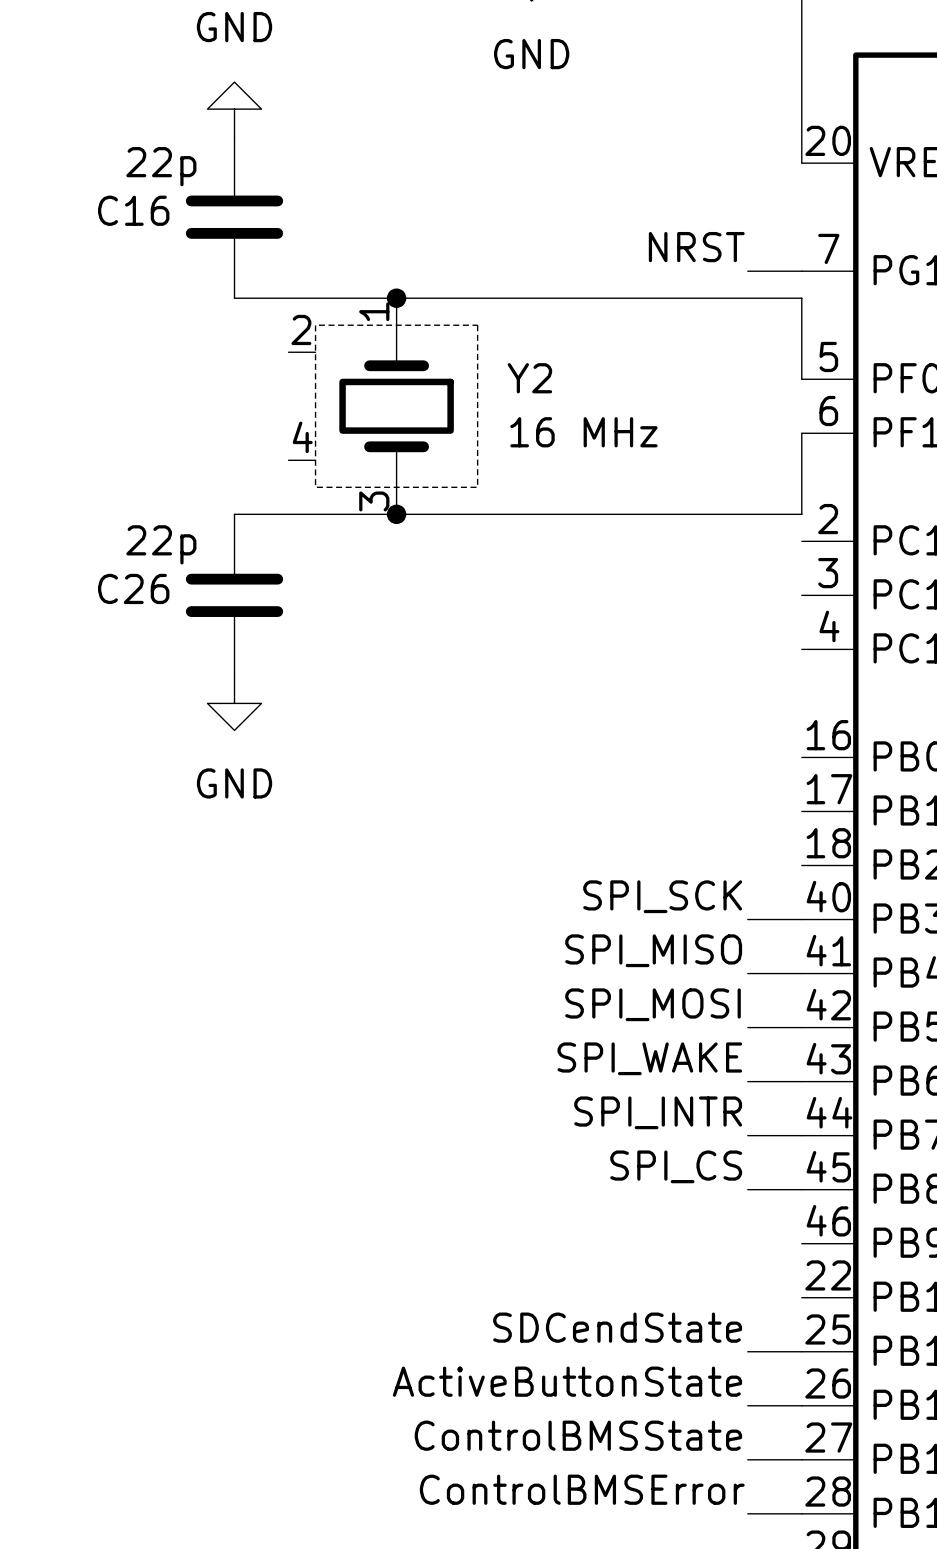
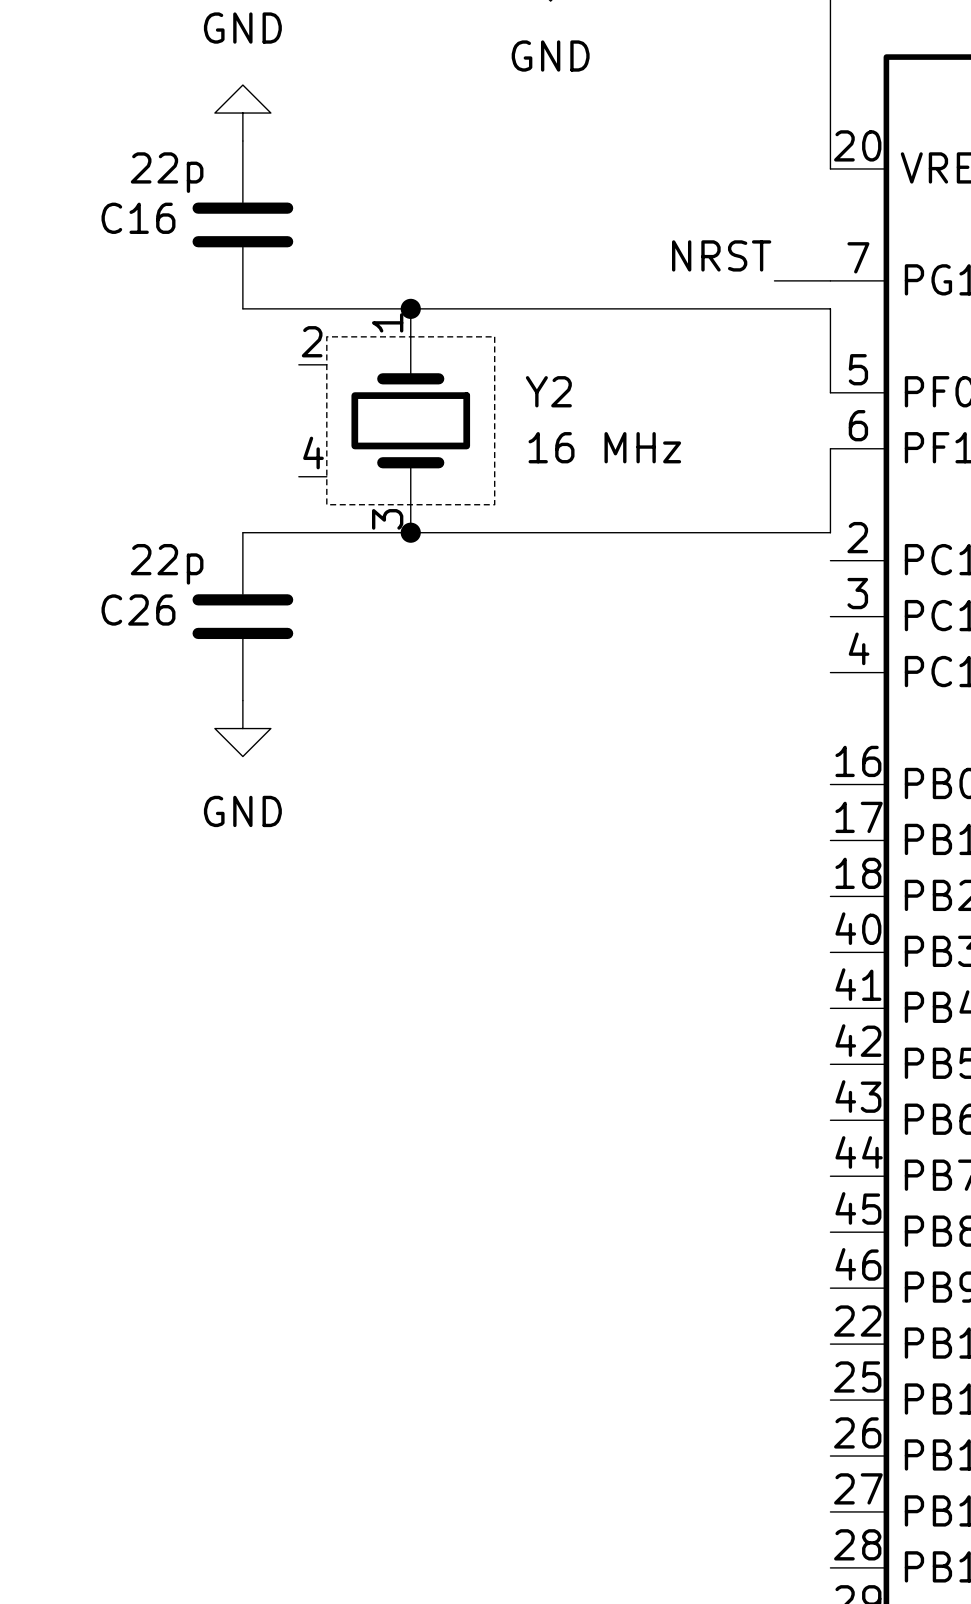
label: SPI_SCK (662, 896) -> none
wire: (747, 919) (801, 919) -> none
label: SPI_MISO (653, 950) -> none
wire: (747, 973) (801, 973) -> none
label: SPI_MOSI (653, 1004) -> none
wire: (747, 1027) (801, 1027) -> none
label: SPI_WAKE (649, 1058) -> none
wire: (747, 1081) (801, 1081) -> none
label: SPI_INTR (658, 1112) -> none
wire: (747, 1135) (801, 1135) -> none
label: SPI_CS (676, 1166) -> none
wire: (747, 1189) (801, 1189) -> none
label: SDCendState (617, 1327) -> none
wire: (747, 1351) (801, 1351) -> none
label: ActiveButtonState (567, 1381) -> none
wire: (747, 1405) (801, 1405) -> none
label: ControlBMSState (578, 1435) -> none
wire: (747, 1459) (801, 1459) -> none
label: ControlBMSError (582, 1489) -> none
wire: (747, 1513) (801, 1513) -> none

